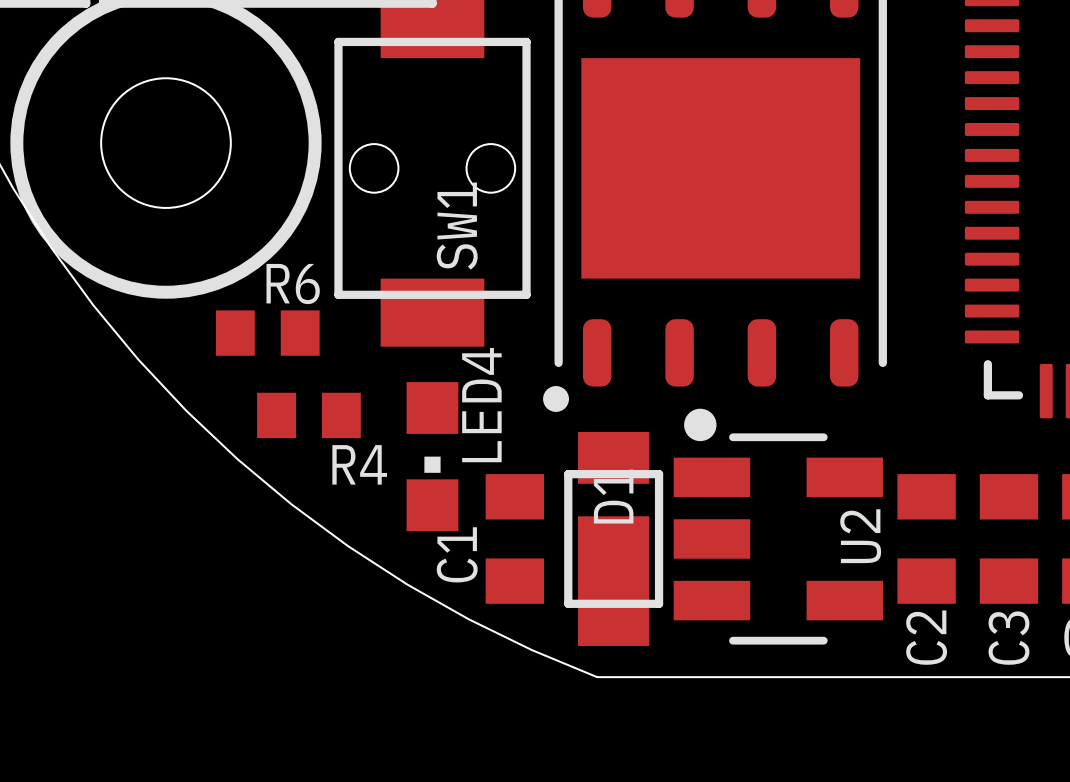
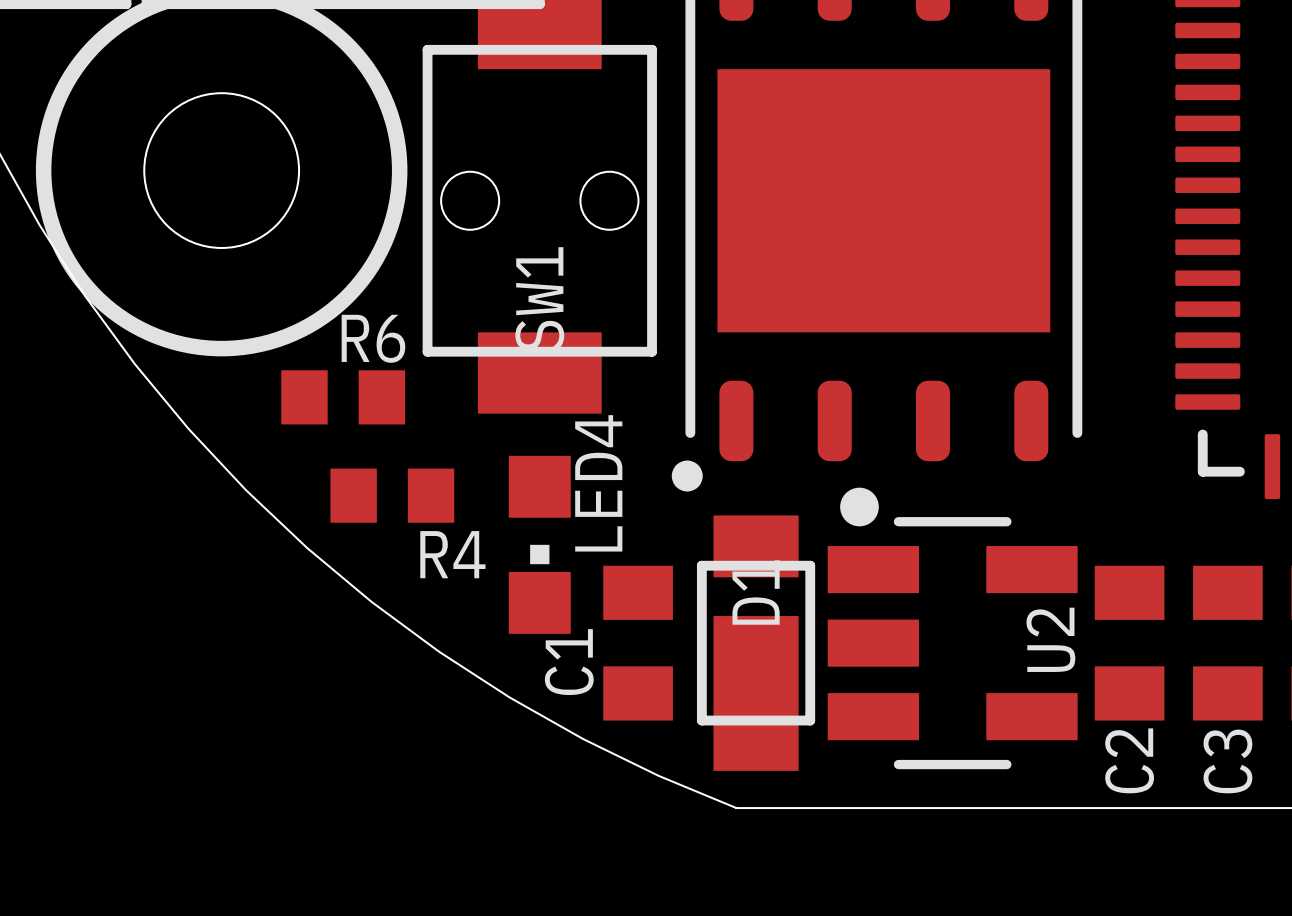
SW1 name position: SW1 (457, 226) -> SW1 (539, 299)

